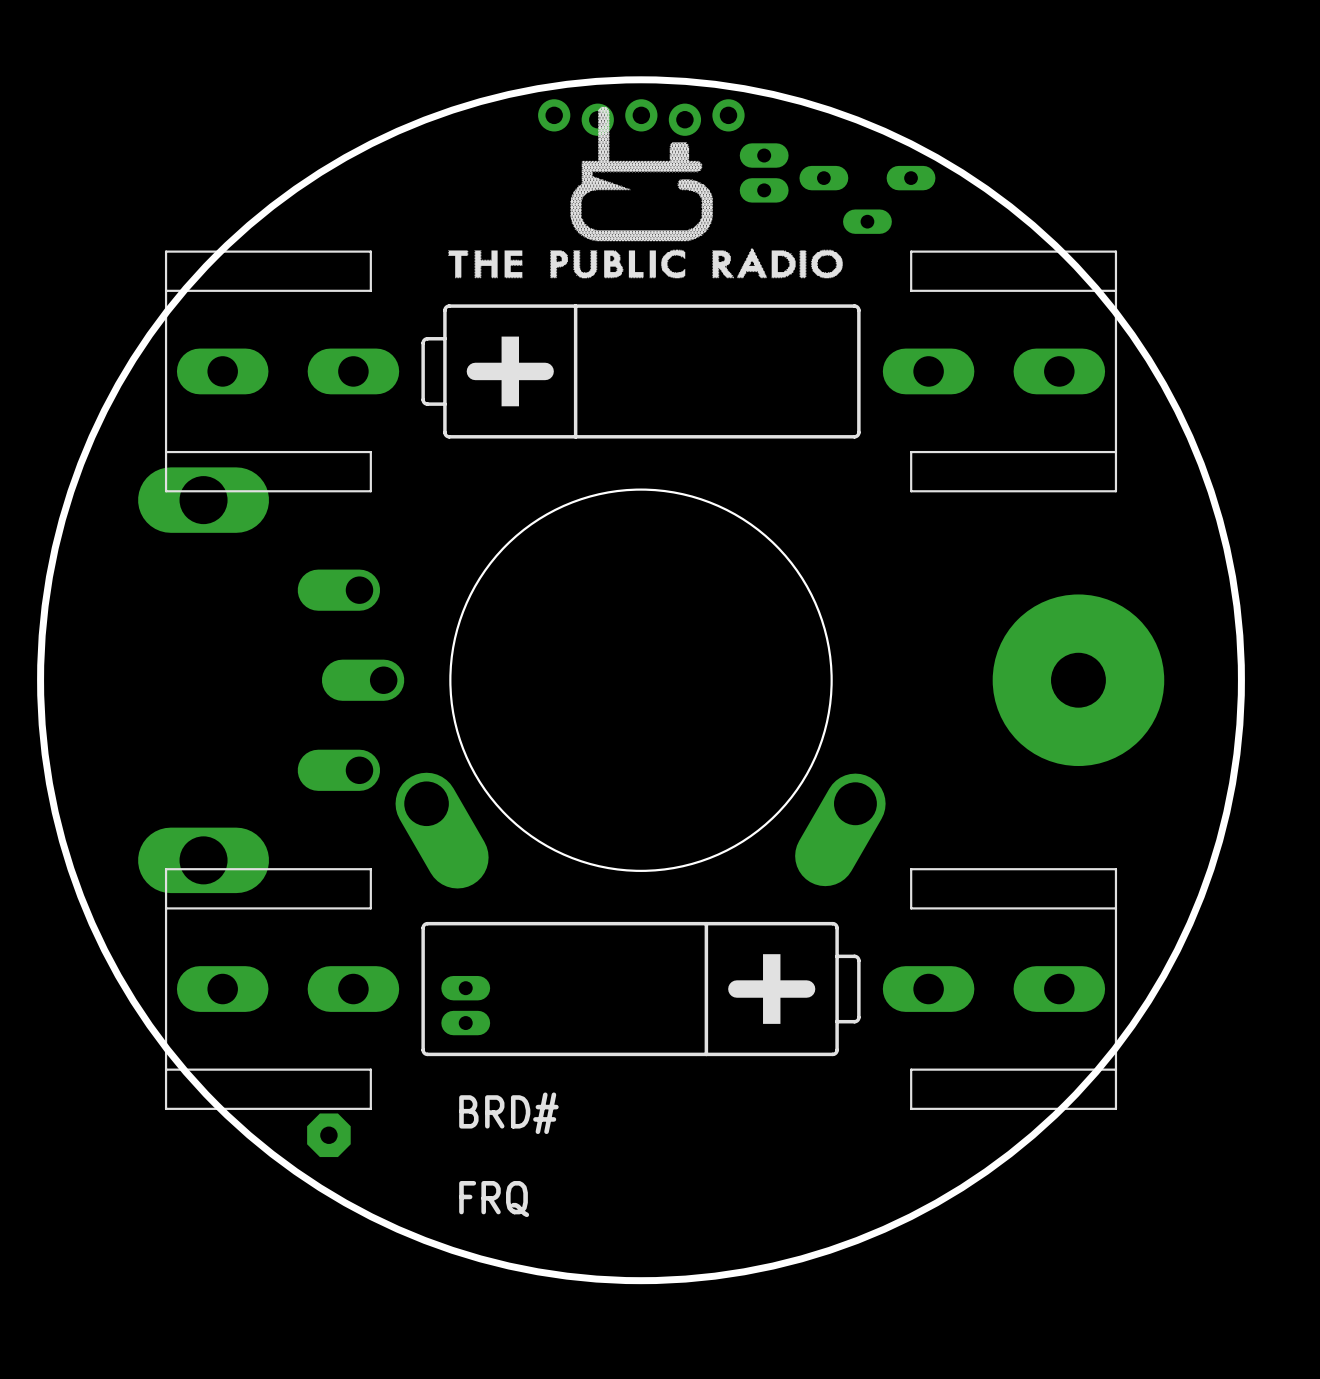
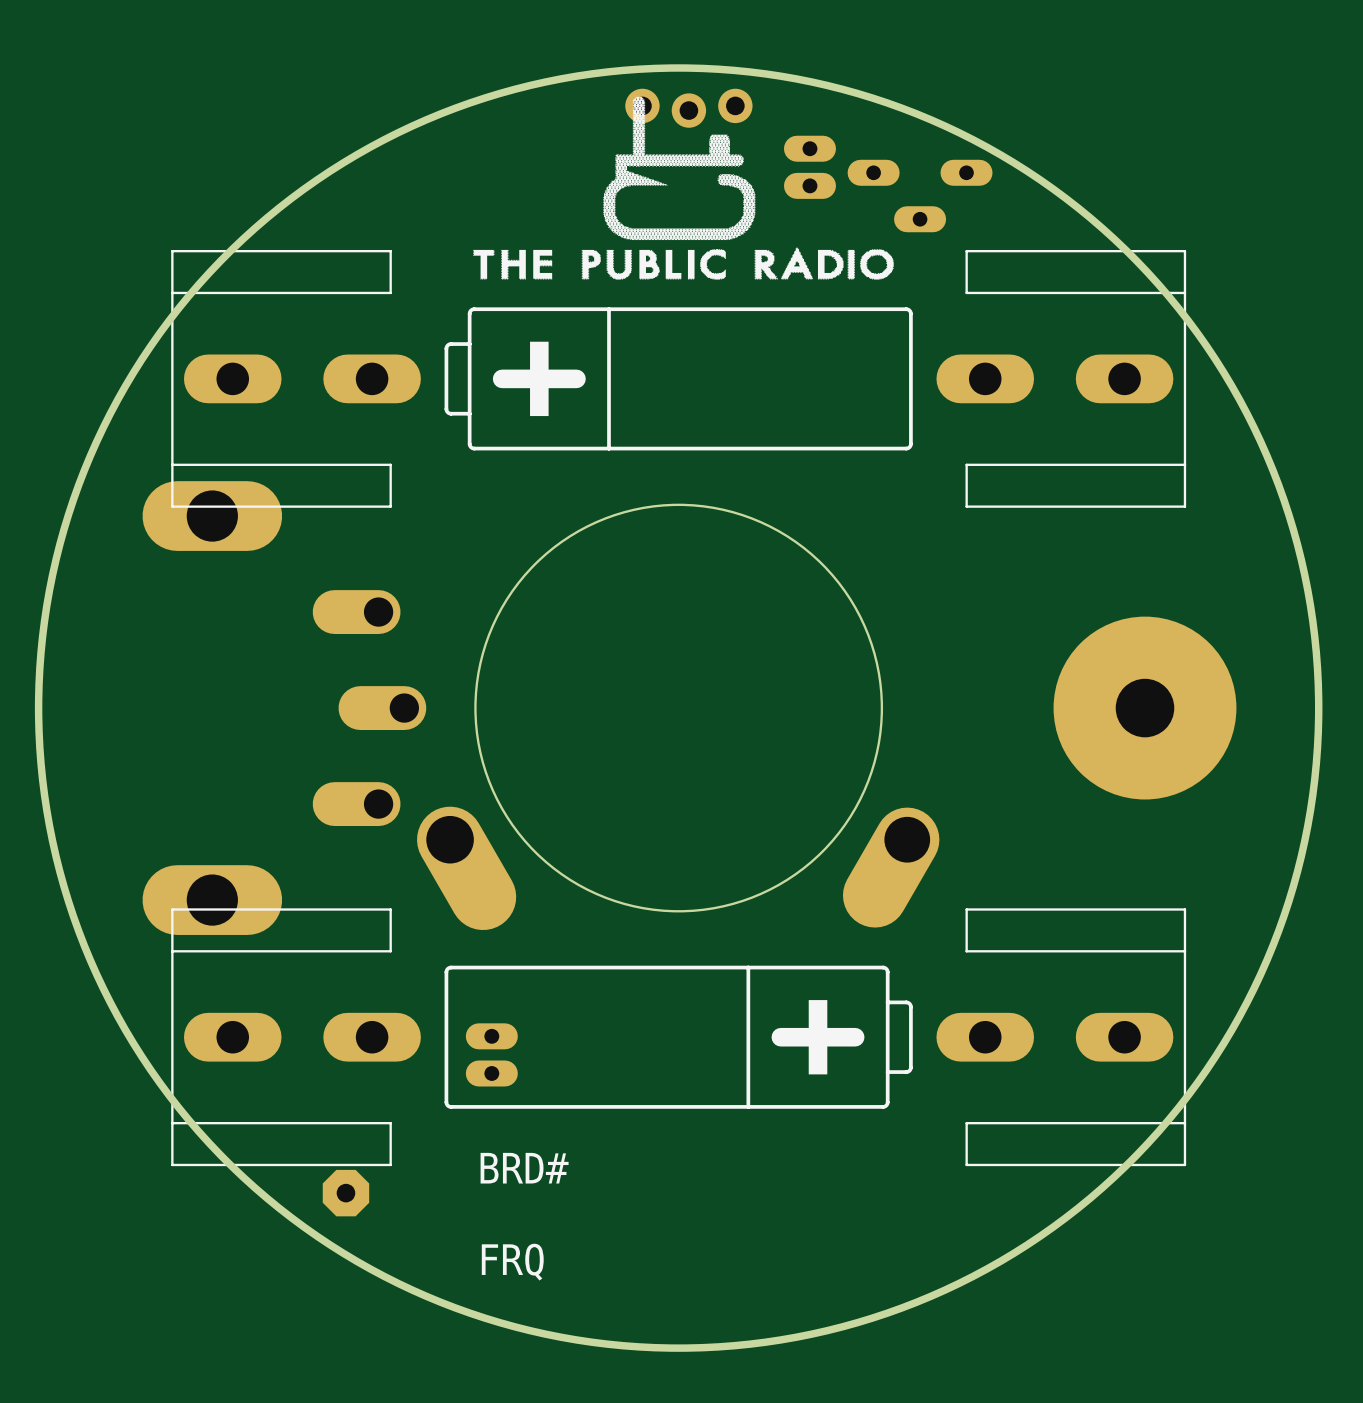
part footprint: [538, 99, 745, 136] -> [625, 88, 753, 128]

